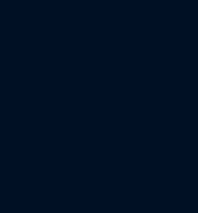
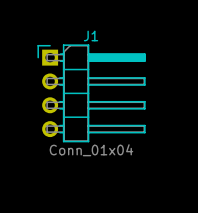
J1: none -> Conn_01x04 (91, 93)

